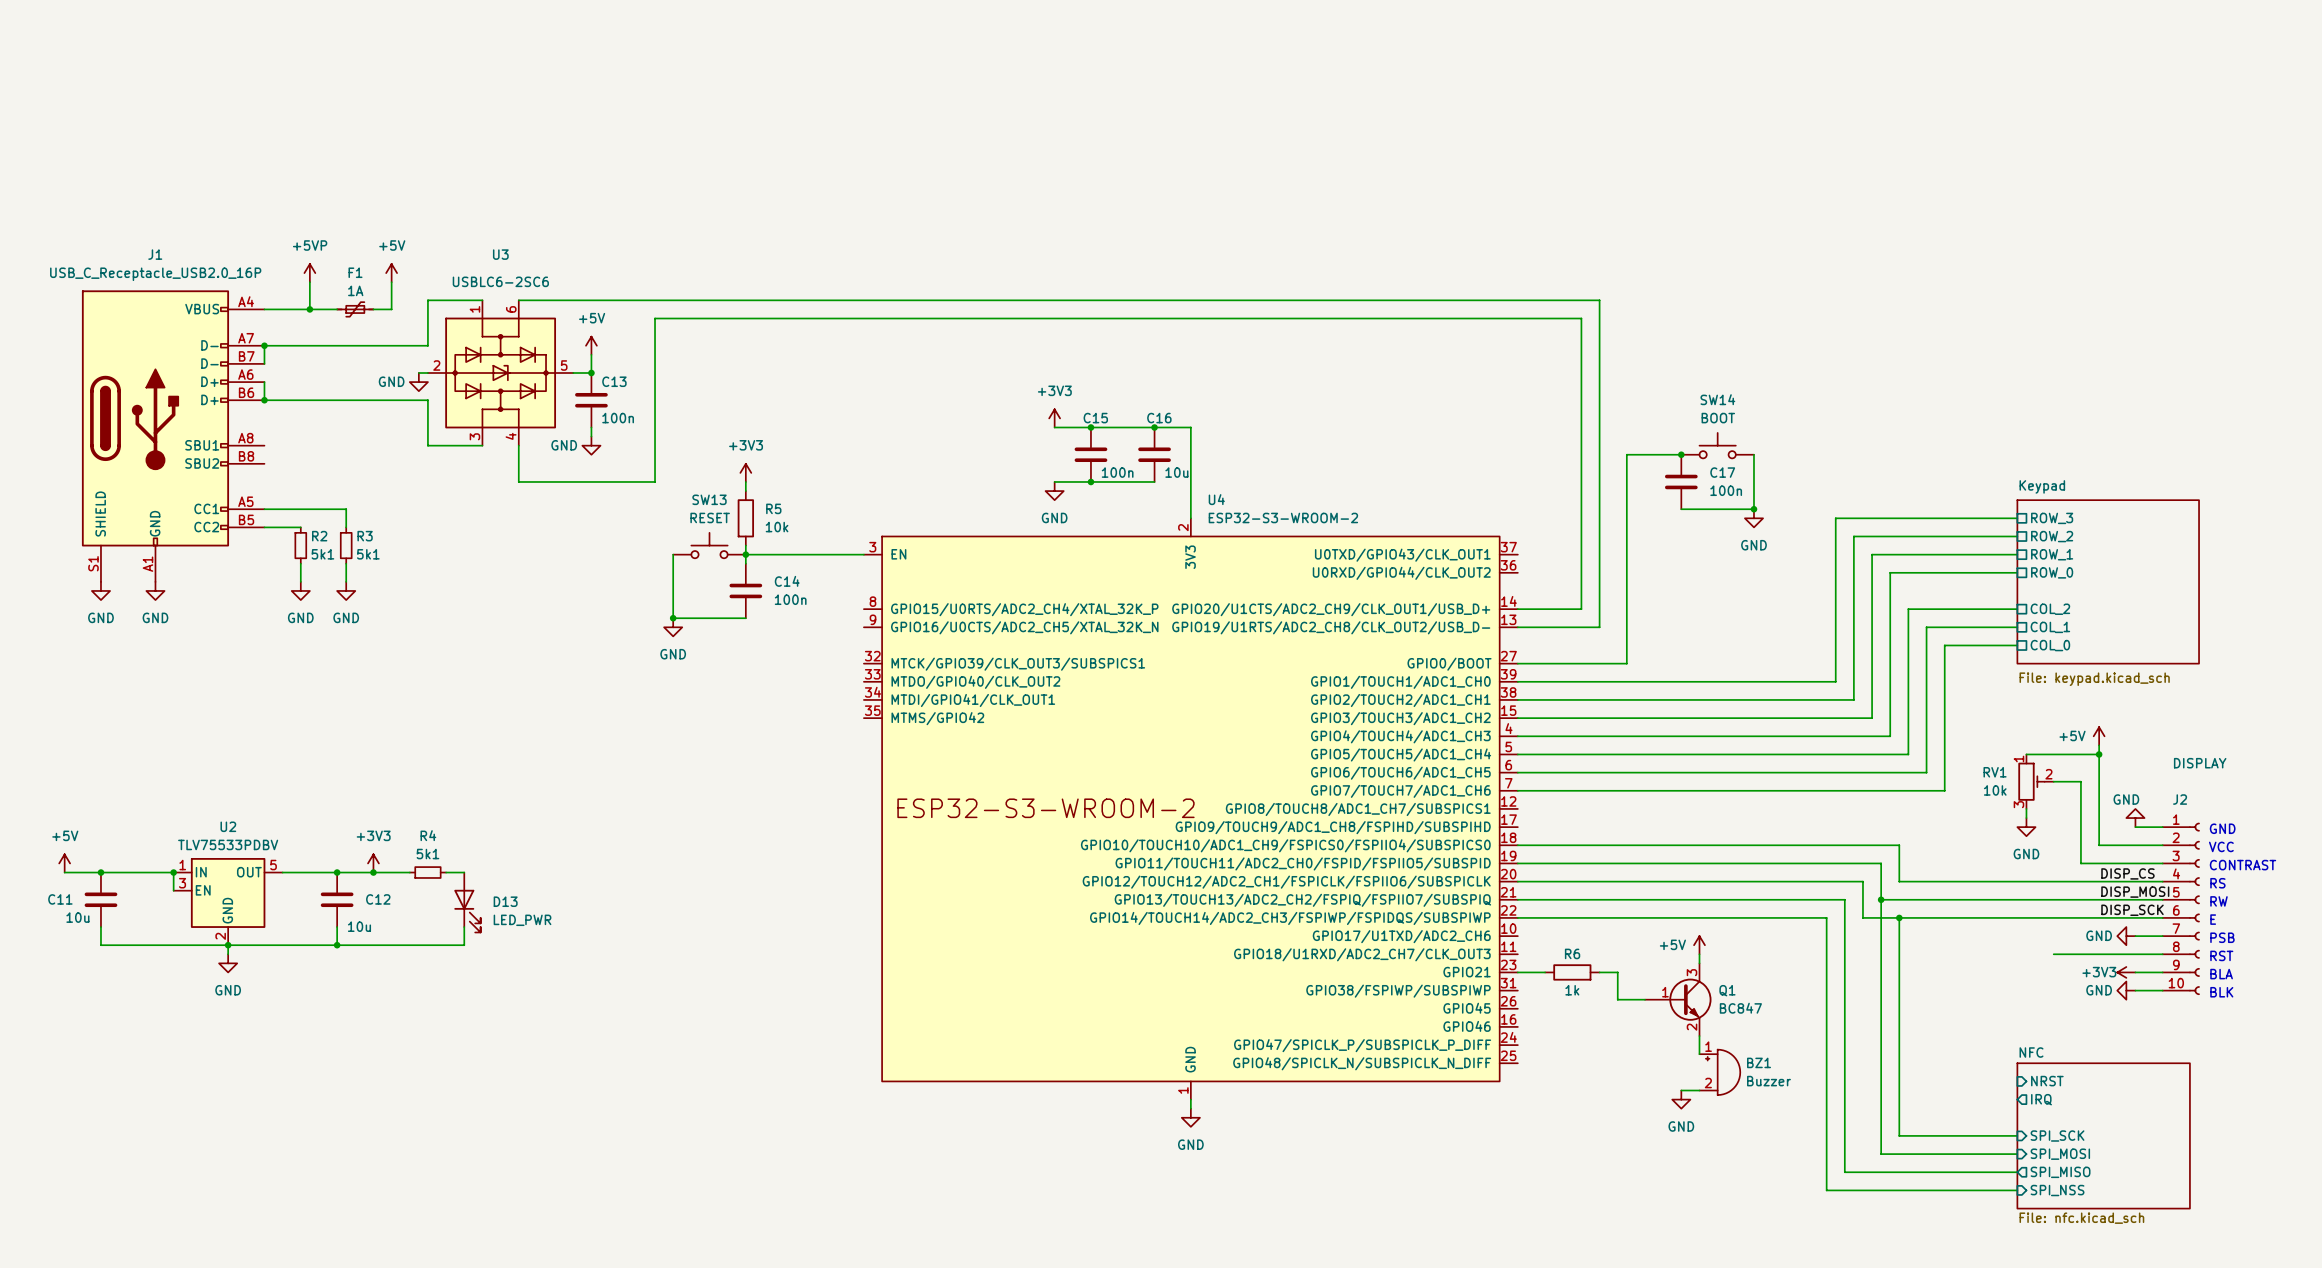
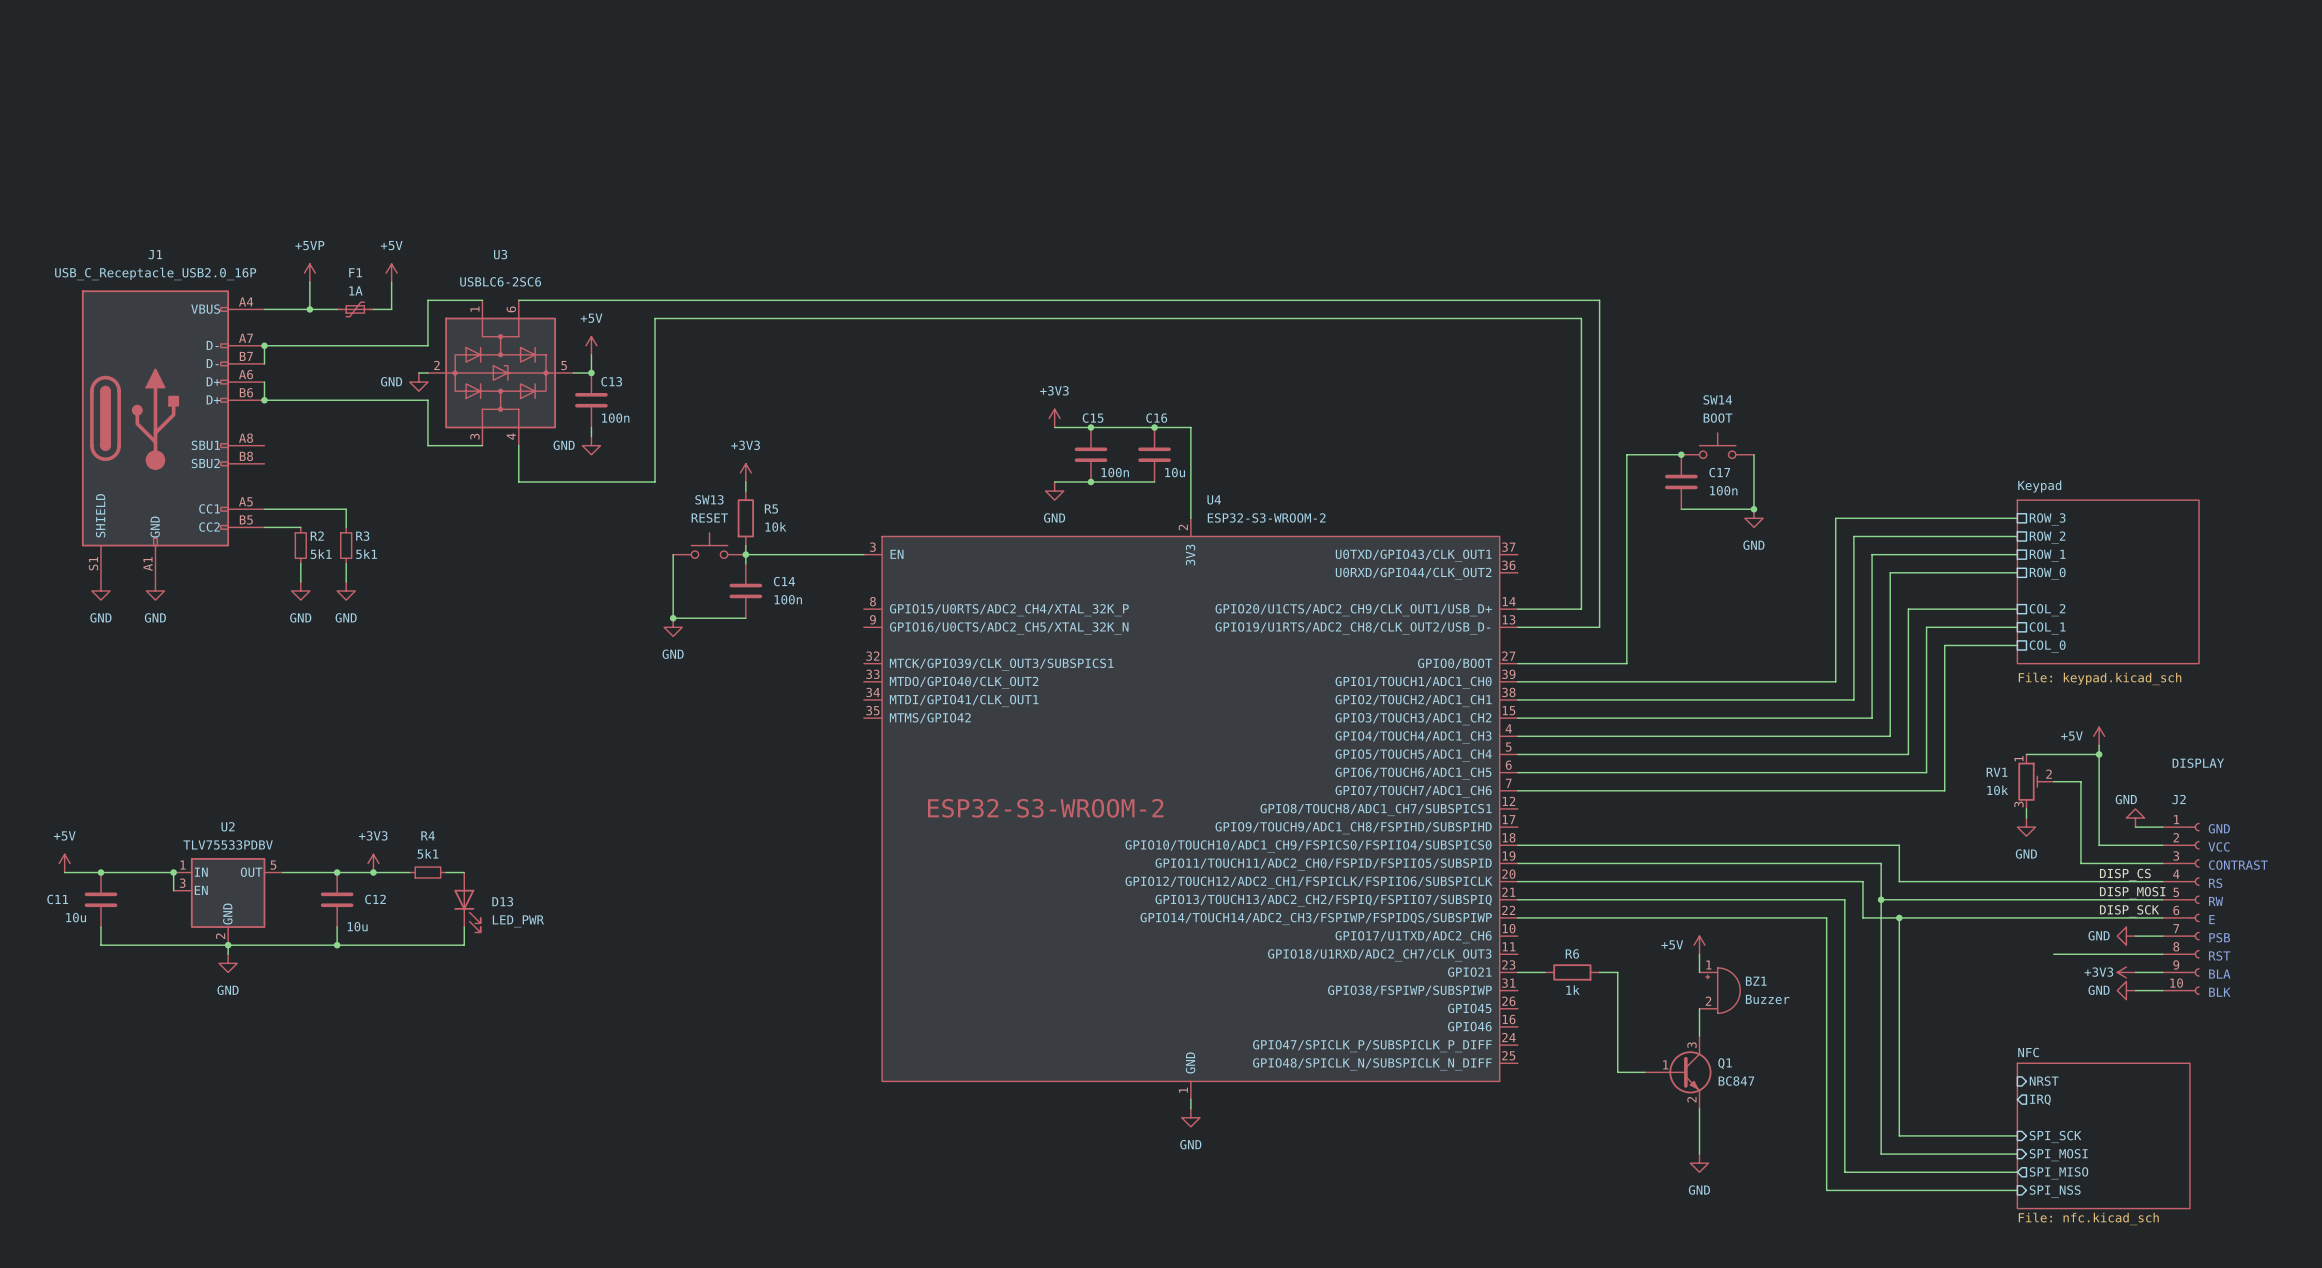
wire: (1617, 999) (1645, 999) -> (1617, 999) (1617, 1072) (1645, 1072)
Q1 position: (1678, 999) -> (1678, 1072)
BZ1 position: (1719, 1072) -> (1719, 990)
wire: (1681, 1090) (1699, 1090) -> none
power symbol position: GND (1681, 1099) -> GND (1699, 1163)
wire: none -> (1699, 1108) (1699, 1154)

